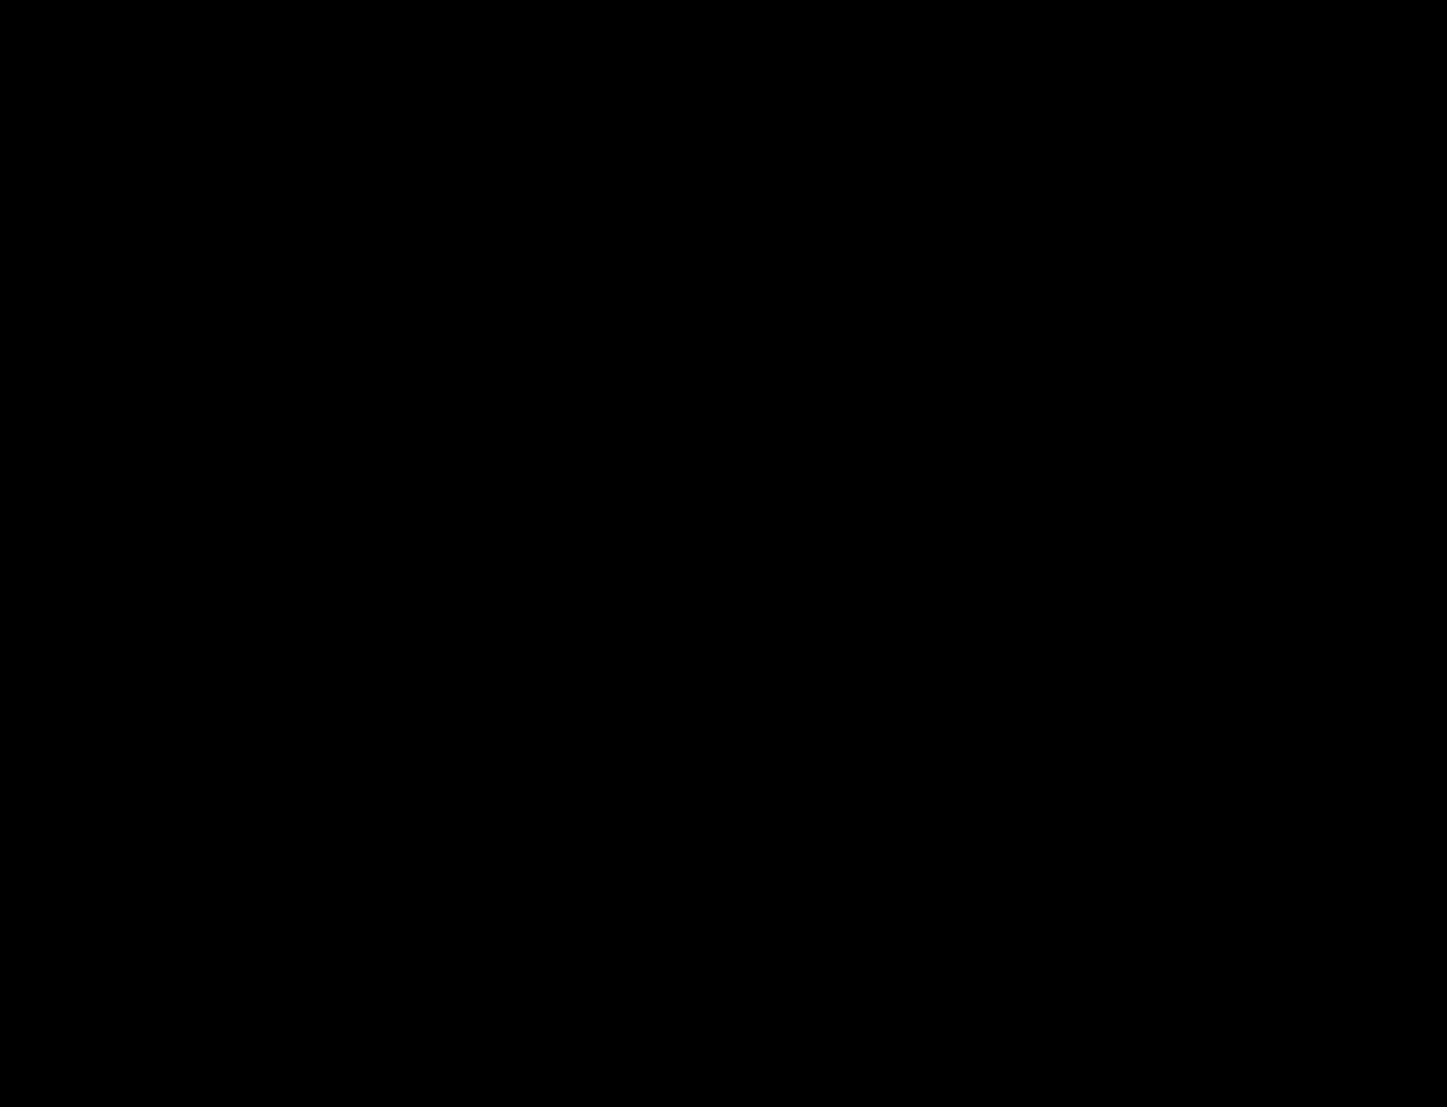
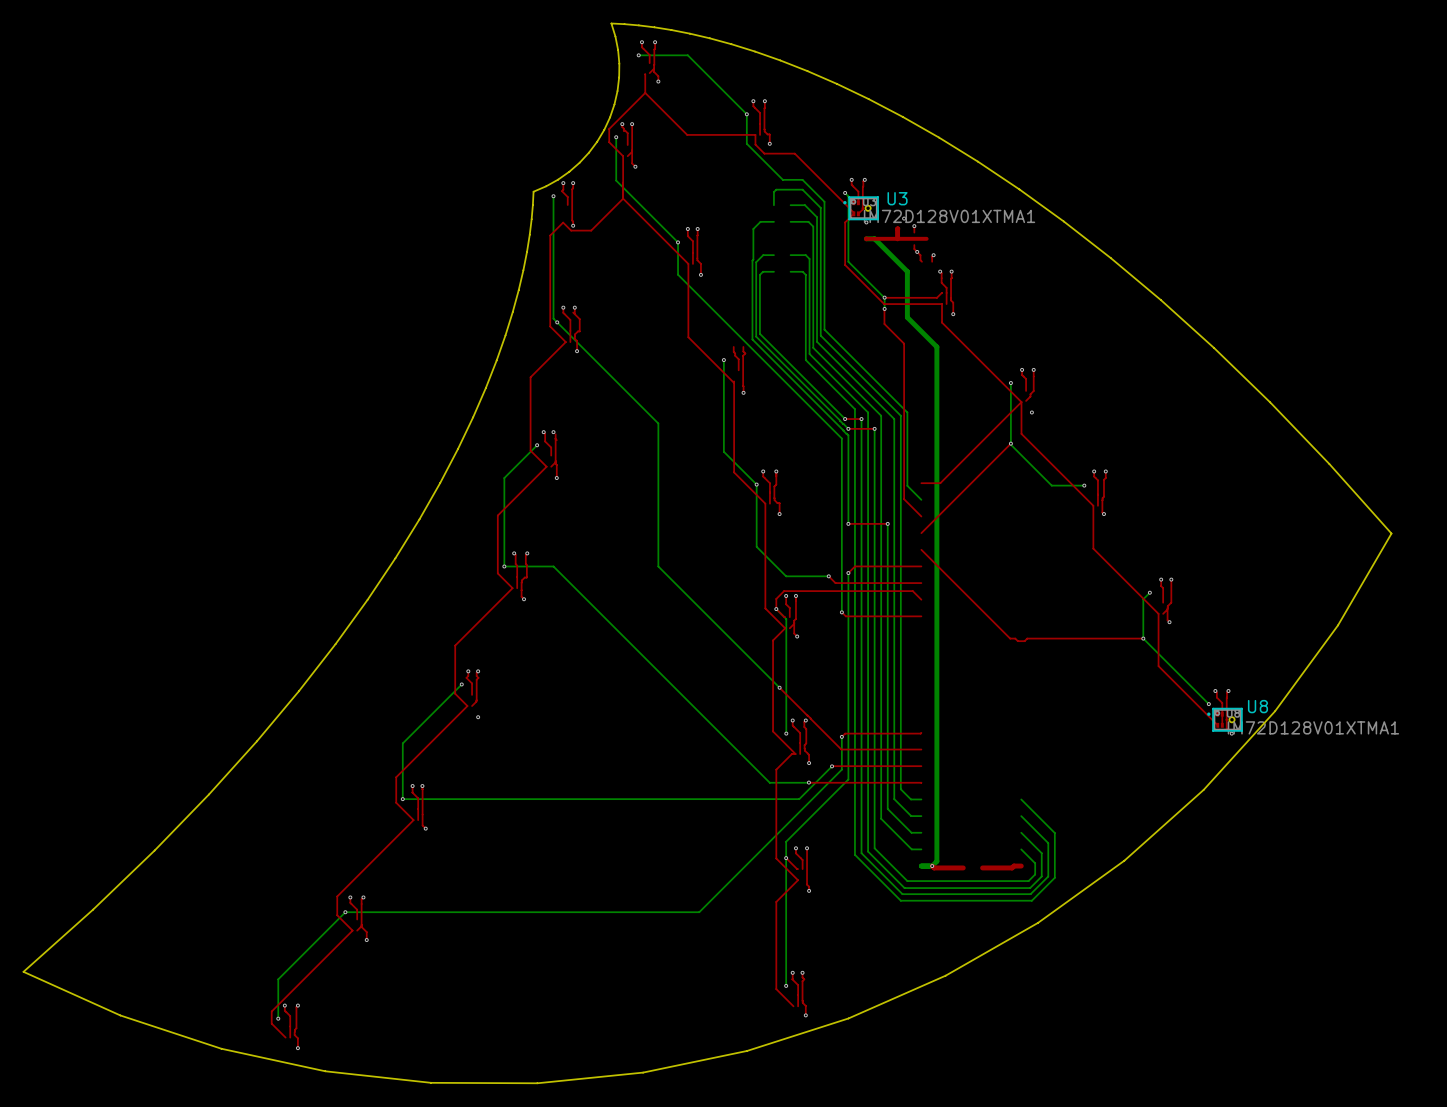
board edge: none -> (611, 23) (619, 63) (617, 91) (610, 117) (597, 141) (579, 162) (558, 179) (533, 191) (529, 234) (523, 270) (512, 311) (496, 360) (458, 448) (419, 519) (395, 558) (335, 644) (256, 741) (154, 850) (93, 909) (23, 971) (120, 1015) (221, 1048) (325, 1071) (431, 1082) (537, 1083) (643, 1072) (747, 1050) (848, 1018) (945, 975) (1038, 922) (1124, 860) (1203, 789) (1275, 711) (1337, 625) (1391, 533) (1329, 463) (1270, 402) (1214, 348) (1111, 258) (1063, 221) (977, 161) (902, 116) (837, 83) (780, 60) (709, 38) (654, 27) (611, 23)
top track: none -> (641, 42) (641, 47) (649, 54) (649, 63)
via: none -> (641, 42)
top track: none -> (655, 42) (654, 71) (658, 76) (658, 81)
via: none -> (655, 42)
bottom track: none -> (638, 55) (687, 55) (746, 114) (746, 143) (782, 179) (802, 179) (824, 201) (824, 329) (907, 412) (907, 485) (921, 499)
via: none -> (638, 55)
top track: none -> (654, 68) (649, 73)
top track: none -> (645, 74) (645, 92)
via: none -> (658, 81)
top track: none -> (645, 92) (609, 128) (609, 142) (623, 156) (623, 198) (591, 230) (571, 230) (563, 222) (550, 235) (550, 326) (565, 342) (530, 377) (530, 450) (546, 466) (497, 515) (497, 573) (512, 588) (455, 645) (455, 693) (467, 706) (396, 777) (396, 802) (413, 820) (337, 896) (337, 915) (352, 930) (271, 1011) (271, 1023) (285, 1037)
top track: none -> (645, 92) (687, 134) (755, 134) (755, 144) (764, 153) (794, 153) (853, 213)
top track: none -> (753, 101) (753, 106) (760, 112) (760, 134)
via: none -> (753, 101)
top track: none -> (764, 101) (764, 131) (769, 134) (769, 143)
via: none -> (764, 101)
via: none -> (746, 114)
top track: none -> (622, 124) (623, 130) (627, 133) (627, 145)
via: none -> (622, 124)
top track: none -> (632, 124) (632, 163) (635, 166)
via: none -> (632, 124)
bottom track: none -> (616, 137) (616, 180) (678, 242) (678, 274) (841, 438) (841, 612)
via: none -> (616, 137)
via: none -> (769, 143)
top track: none -> (632, 151) (627, 156)
via: none -> (635, 166)
top track: none -> (851, 179) (851, 184) (858, 191) (858, 202)
via: none -> (851, 179)
top track: none -> (864, 179) (862, 209) (858, 213)
via: none -> (864, 179)
top track: none -> (563, 183) (562, 191) (567, 196) (567, 205)
via: none -> (563, 183)
top track: none -> (573, 183) (573, 225)
via: none -> (573, 183)
bottom track: none -> (845, 192) (848, 196) (848, 261) (884, 297) (884, 308)
via: none -> (845, 192)
bottom track: none -> (553, 196) (553, 318) (658, 423) (658, 566) (779, 687)
via: none -> (553, 196)
top track: none -> (623, 198) (688, 263) (688, 337) (734, 383)
bottom track: none -> (773, 205) (773, 192) (776, 189) (802, 189) (820, 207) (820, 335) (900, 415) (900, 789) (910, 799) (921, 799)
bottom track: none -> (790, 205) (804, 205) (817, 217) (817, 341) (894, 419) (894, 799) (911, 816) (921, 816)
U3: none -> IM72D128V01XTMA1 (860, 208)
top track: none -> (853, 213) (845, 222) (845, 265) (884, 304) (942, 304) (942, 322) (1021, 402)
via: none -> (904, 218)
bottom track: none -> (773, 221) (760, 221) (753, 228) (752, 339) (848, 435) (848, 523)
bottom track: none -> (790, 221) (808, 221) (813, 226) (813, 347) (881, 415) (881, 818) (911, 849) (921, 849)
via: none -> (866, 222)
via: none -> (573, 225)
top track: none -> (914, 226) (914, 232)
via: none -> (914, 226)
top track: none -> (687, 228) (687, 236) (692, 241) (692, 263)
via: none -> (687, 228)
top track: none -> (697, 228) (697, 260) (700, 263) (700, 274)
via: none -> (697, 228)
top track: none -> (897, 228) (897, 238)
top track: none -> (866, 238) (926, 238)
bottom track: none -> (866, 238) (874, 238) (907, 271) (907, 317) (936, 346) (936, 861) (932, 866) (921, 866)
via: none -> (678, 242)
top track: none -> (914, 245) (914, 249) (920, 255) (921, 261)
via: none -> (917, 251)
bottom track: none -> (773, 255) (763, 255) (756, 262) (756, 336) (848, 428)
bottom track: none -> (790, 255) (805, 255) (809, 258) (809, 353) (868, 412) (868, 851) (904, 888) (1030, 888) (1041, 876) (1041, 853) (1021, 832)
top track: none -> (933, 255) (932, 261)
via: none -> (933, 255)
bottom track: none -> (773, 271) (763, 271) (759, 274) (759, 333) (845, 419)
bottom track: none -> (790, 271) (802, 271) (805, 274) (805, 360) (854, 409) (854, 854) (900, 900) (1031, 900) (1054, 877) (1054, 833) (1021, 799)
top track: none -> (940, 271) (941, 282) (946, 287) (946, 304)
via: none -> (940, 271)
top track: none -> (951, 271) (951, 300) (953, 302) (953, 314)
via: none -> (951, 271)
via: none -> (700, 274)
top track: none -> (942, 292) (936, 297) (884, 297)
via: none -> (884, 297)
top track: none -> (563, 307) (563, 312) (570, 319) (570, 342)
via: none -> (563, 307)
top track: none -> (574, 307) (574, 314)
via: none -> (574, 307)
top track: none -> (884, 308) (884, 324) (904, 343) (904, 499) (921, 516)
via: none -> (884, 308)
top track: none -> (573, 312) (579, 319) (579, 331) (574, 336) (577, 341) (577, 351)
via: none -> (953, 314)
via: none -> (557, 322)
top track: none -> (733, 346) (735, 355) (738, 359) (738, 370)
top track: none -> (743, 346) (745, 353) (743, 355) (743, 392)
via: none -> (577, 351)
bottom track: none -> (723, 360) (723, 451) (756, 484) (756, 546) (786, 576) (828, 576)
via: none -> (723, 360)
top track: none -> (1022, 369) (1022, 374) (1026, 378) (1026, 390)
via: none -> (1022, 369)
top track: none -> (1033, 369) (1033, 391) (1026, 400)
via: none -> (1033, 369)
top track: none -> (734, 381) (734, 472) (765, 503) (765, 608) (785, 628) (773, 640) (773, 731) (795, 754) (791, 754) (776, 769) (776, 858) (798, 880) (776, 901) (776, 989) (793, 1006)
bottom track: none -> (1010, 383) (1010, 444) (1051, 485) (1084, 485)
via: none -> (1010, 383)
via: none -> (743, 392)
top track: none -> (1021, 402) (1021, 433) (1093, 505) (1093, 548) (1158, 613) (1158, 666) (1217, 725)
top track: none -> (1021, 402) (940, 483) (921, 483)
via: none -> (1031, 412)
top track: none -> (845, 419) (861, 419)
via: none -> (845, 419)
bottom track: none -> (861, 419) (861, 853) (902, 894) (1030, 894) (1048, 876) (1048, 843) (1021, 816)
via: none -> (861, 419)
top track: none -> (848, 428) (874, 428)
via: none -> (848, 428)
bottom track: none -> (874, 428) (874, 848) (907, 881) (1028, 881) (1035, 874) (1035, 863) (1021, 849)
via: none -> (874, 428)
top track: none -> (543, 432) (545, 441) (551, 447) (551, 455)
via: none -> (543, 432)
via: none -> (553, 432)
top track: none -> (555, 434) (556, 478)
top track: none -> (555, 438) (556, 440)
top track: none -> (1010, 443) (921, 533)
via: none -> (1010, 443)
bottom track: none -> (537, 445) (504, 478) (504, 566) (553, 566) (769, 782) (808, 782)
via: none -> (537, 445)
top track: none -> (555, 462) (551, 466)
top track: none -> (763, 471) (763, 476) (769, 483) (769, 503)
via: none -> (763, 471)
top track: none -> (776, 471) (774, 498) (779, 503) (779, 514)
via: none -> (776, 471)
top track: none -> (1094, 471) (1094, 476) (1097, 480) (1097, 505)
via: none -> (1094, 471)
top track: none -> (1105, 471) (1102, 500) (1103, 514)
via: none -> (1105, 471)
via: none -> (556, 478)
via: none -> (756, 484)
via: none -> (1084, 485)
via: none -> (779, 514)
via: none -> (1103, 514)
top track: none -> (848, 523) (887, 523)
via: none -> (848, 523)
bottom track: none -> (887, 523) (887, 808) (911, 832) (921, 832)
via: none -> (887, 523)
top track: none -> (921, 549) (1010, 638) (1015, 638) (1017, 641) (1024, 641) (1027, 638) (1143, 638)
top track: none -> (514, 553) (517, 565) (517, 588)
via: none -> (514, 553)
top track: none -> (527, 553) (526, 577) (521, 582) (521, 596) (524, 599)
via: none -> (527, 553)
via: none -> (504, 566)
top track: none -> (921, 566) (855, 566) (848, 573)
bottom track: none -> (848, 573) (848, 779) (786, 841) (786, 985)
via: none -> (848, 573)
top track: none -> (828, 576) (835, 583) (921, 583)
via: none -> (828, 576)
top track: none -> (1161, 579) (1163, 602)
via: none -> (1161, 579)
top track: none -> (1171, 579) (1171, 602) (1167, 608) (1167, 620) (1169, 622)
via: none -> (1171, 579)
bottom track: none -> (1149, 592) (1143, 599) (1143, 638) (1208, 704)
via: none -> (1149, 592)
top track: none -> (786, 595) (786, 604) (789, 607) (789, 617)
via: none -> (786, 595)
top track: none -> (795, 595) (794, 633) (797, 636)
via: none -> (795, 595)
via: none -> (524, 599)
top track: none -> (921, 599) (912, 591) (784, 591) (776, 598) (776, 609) (785, 617)
bottom track: none -> (776, 609) (786, 619) (786, 733)
via: none -> (776, 609)
top track: none -> (1167, 609) (1163, 613)
top track: none -> (841, 612) (845, 616) (921, 616)
via: none -> (841, 612)
via: none -> (1169, 622)
top track: none -> (794, 623) (789, 628)
via: none -> (797, 636)
via: none -> (1143, 638)
top track: none -> (468, 671) (466, 677) (472, 683) (472, 694)
via: none -> (468, 671)
top track: none -> (478, 671) (476, 701) (472, 706)
via: none -> (478, 671)
bottom track: none -> (461, 684) (402, 743) (402, 799) (799, 799) (832, 766)
via: none -> (461, 684)
top track: none -> (779, 687) (841, 749) (921, 749)
via: none -> (779, 687)
top track: none -> (1215, 691) (1216, 697) (1222, 702) (1222, 725)
via: none -> (1215, 691)
top track: none -> (1228, 691) (1226, 728) (1231, 733)
via: none -> (1228, 691)
via: none -> (1208, 704)
via: none -> (478, 717)
U8: none -> IM72D128V01XTMA1 (1224, 719)
top track: none -> (792, 720) (792, 725) (800, 733) (800, 754)
via: none -> (792, 720)
top track: none -> (805, 720) (804, 748) (809, 754) (809, 763)
via: none -> (805, 720)
top track: none -> (921, 732) (845, 733) (841, 736)
via: none -> (786, 733)
via: none -> (1231, 733)
bottom track: none -> (841, 736) (841, 769) (699, 912) (345, 912) (278, 979) (278, 1018)
via: none -> (841, 736)
via: none -> (809, 763)
via: none -> (832, 766)
top track: none -> (921, 766) (832, 766)
top track: none -> (808, 782) (921, 782)
via: none -> (808, 782)
top track: none -> (412, 786) (412, 792) (418, 798) (418, 820)
via: none -> (412, 786)
top track: none -> (422, 786) (422, 825) (425, 828)
via: none -> (422, 786)
via: none -> (402, 799)
via: none -> (425, 828)
top track: none -> (795, 848) (795, 853) (802, 859) (802, 869)
via: none -> (795, 848)
top track: none -> (807, 848) (807, 884) (809, 890)
via: none -> (807, 848)
top track: none -> (786, 858) (798, 869)
via: none -> (786, 858)
top track: none -> (932, 866) (934, 867) (963, 867)
via: none -> (932, 866)
top track: none -> (1021, 866) (982, 867)
via: none -> (809, 890)
top track: none -> (350, 897) (350, 902) (357, 909) (357, 919)
via: none -> (350, 897)
top track: none -> (363, 897) (361, 899) (361, 926) (357, 930)
via: none -> (363, 897)
via: none -> (345, 912)
top track: none -> (361, 925) (366, 932) (366, 940)
via: none -> (366, 940)
top track: none -> (792, 972) (792, 979) (798, 985) (798, 1006)
via: none -> (792, 972)
top track: none -> (802, 972) (804, 979) (802, 981) (802, 1002) (805, 1005)
via: none -> (802, 972)
via: none -> (786, 985)
top track: none -> (284, 1005) (284, 1010) (290, 1016) (290, 1037)
via: none -> (284, 1005)
top track: none -> (297, 1005) (294, 1031)
via: none -> (297, 1005)
top track: none -> (805, 1005) (805, 1015)
via: none -> (805, 1015)
via: none -> (278, 1018)
top track: none -> (294, 1032) (297, 1038) (297, 1048)
via: none -> (297, 1048)

